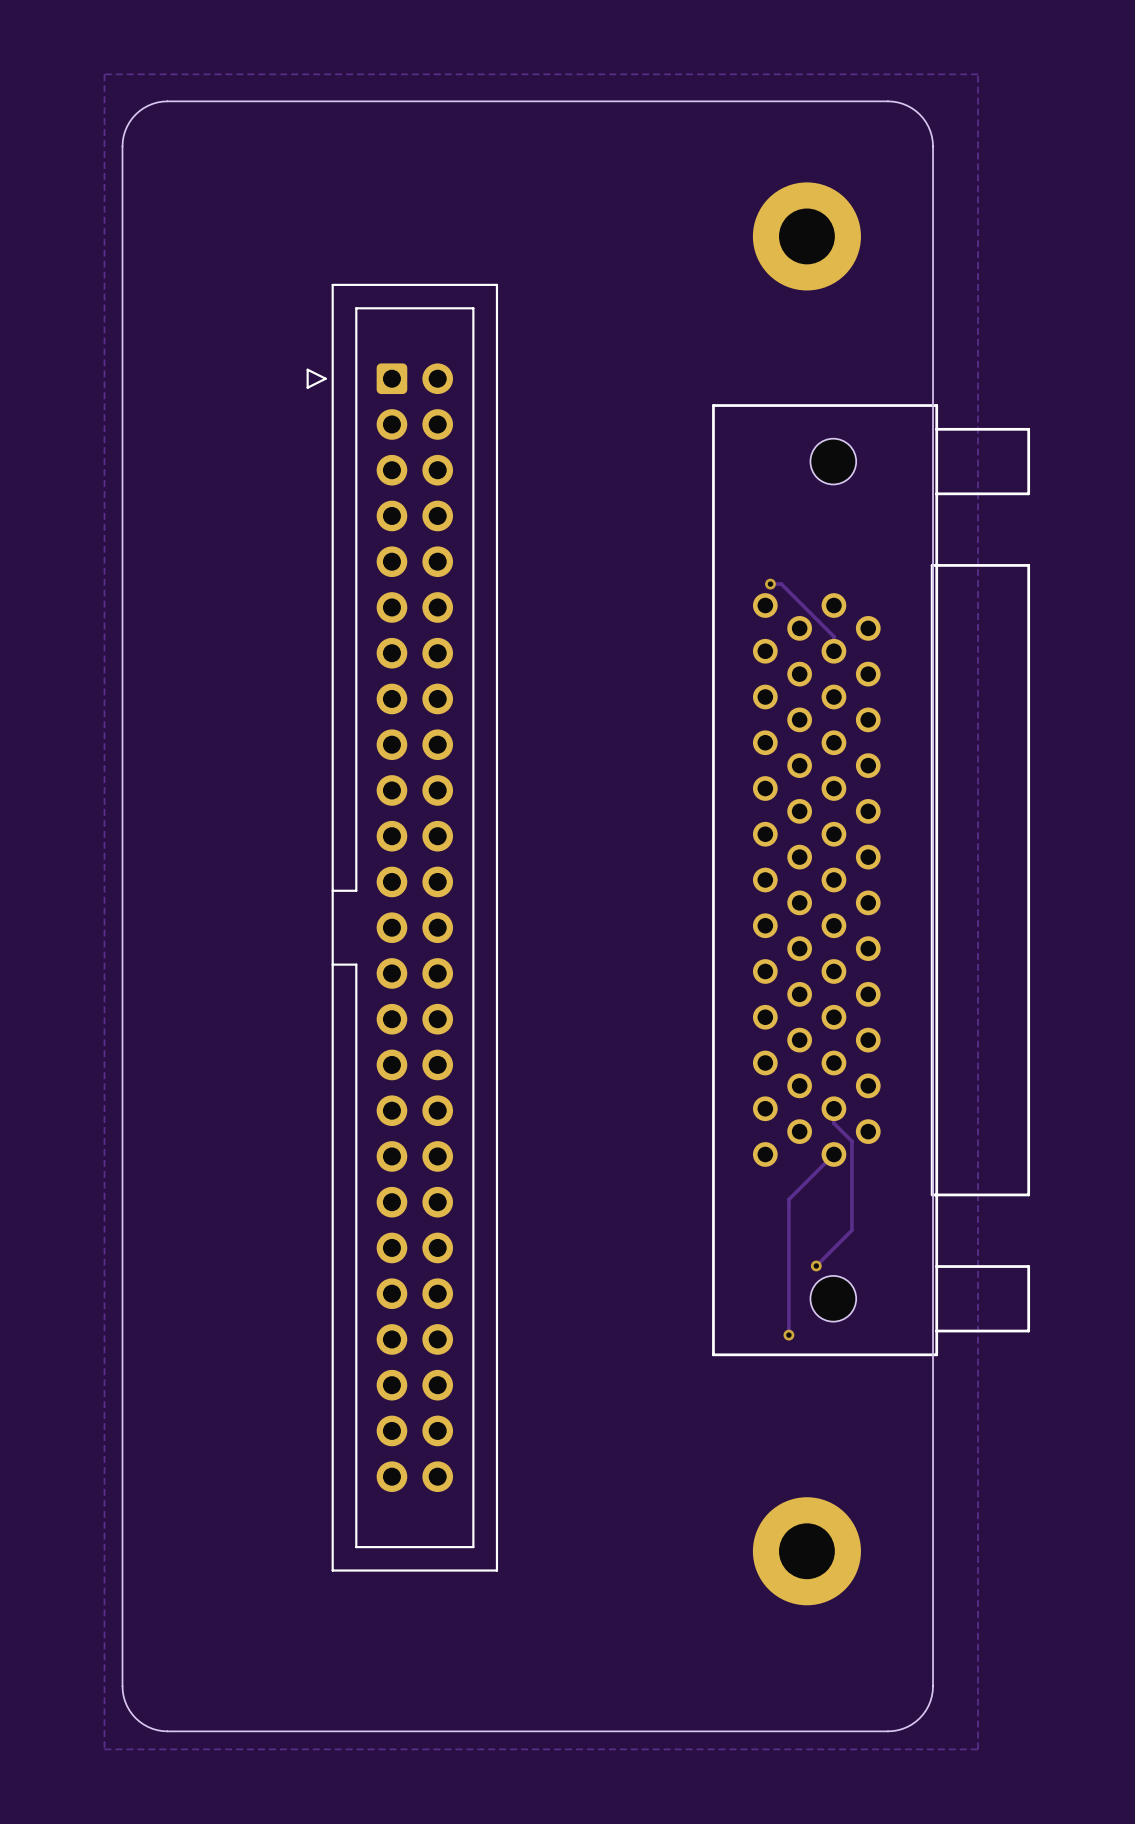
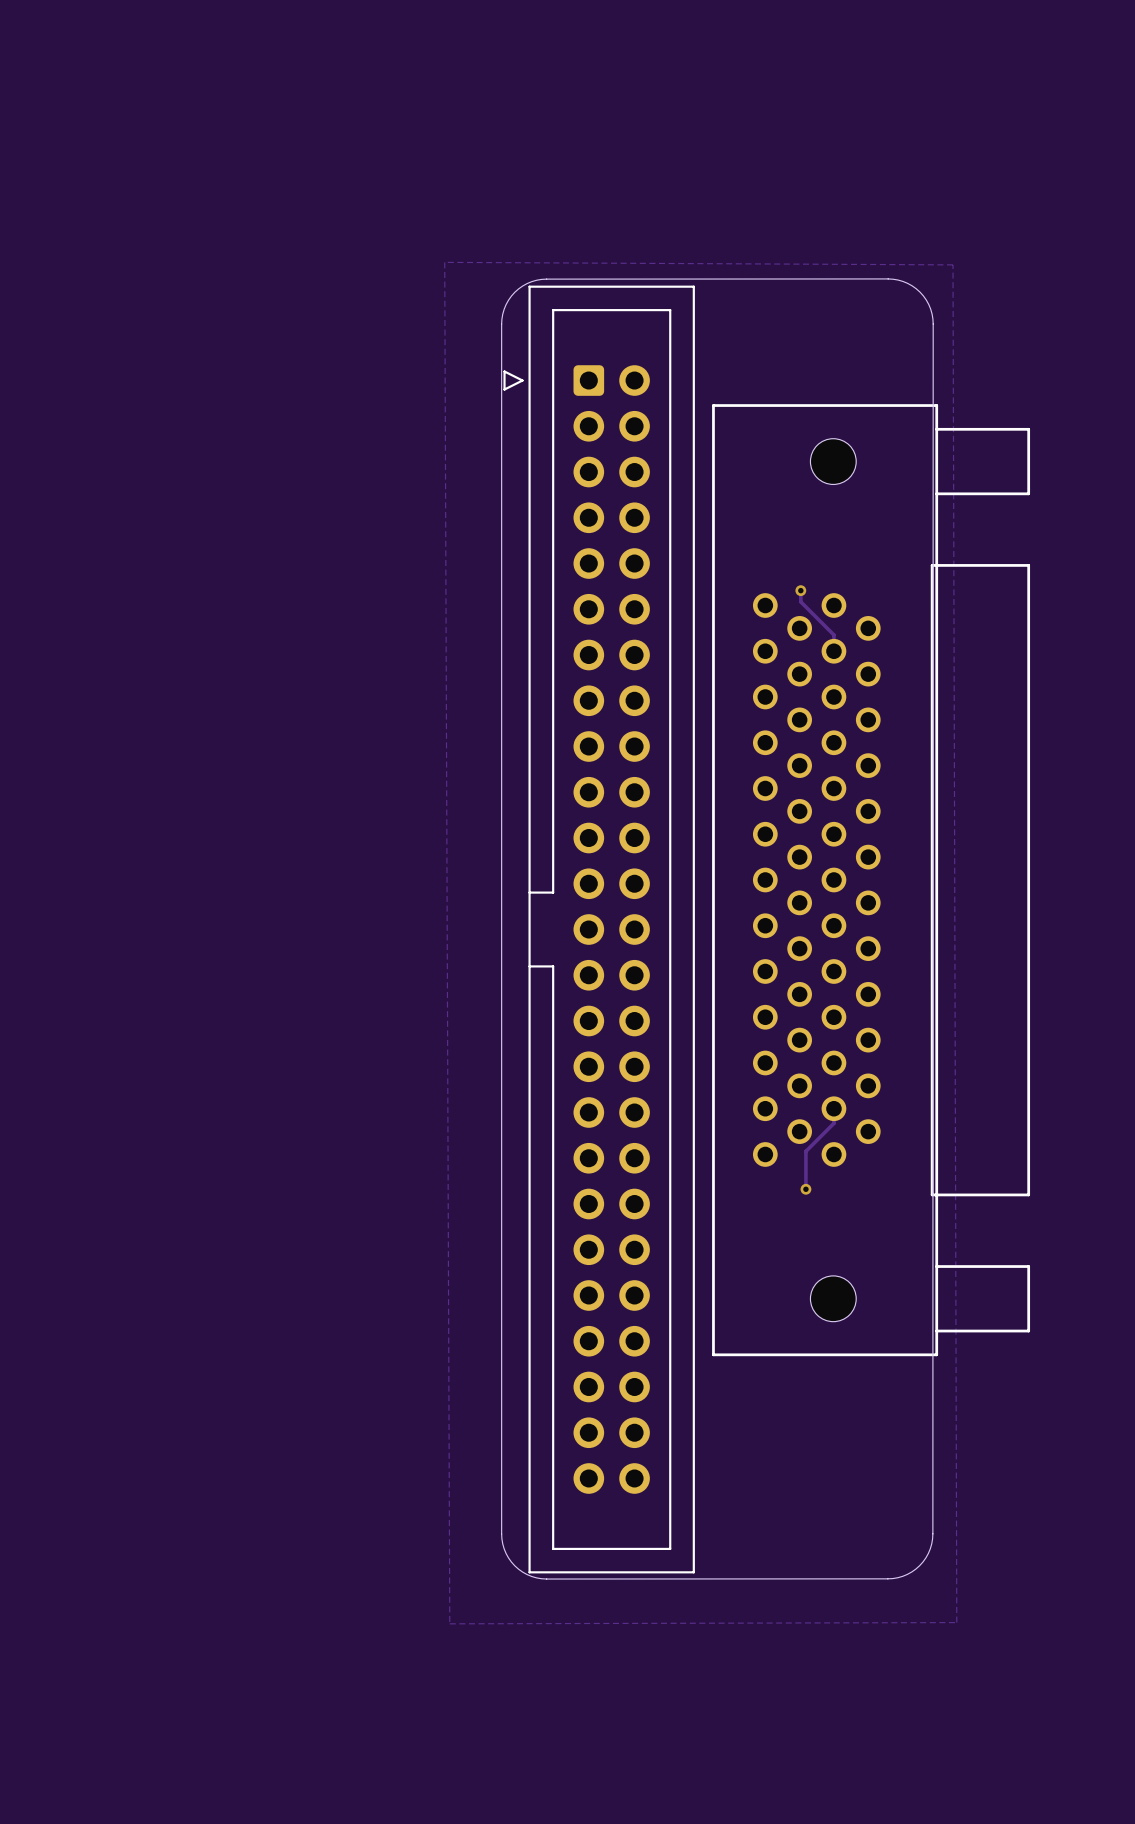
zone outline: (104, 74) (104, 1749) (978, 1749) (978, 74) (104, 74) -> none
board edge: (167, 101) (887, 101) (898, 102) (911, 108) (923, 118) (928, 126) (933, 146) (933, 1686) (931, 1696) (926, 1710) (919, 1718) (907, 1726) (887, 1731) (167, 1731) (157, 1730) (143, 1724) (135, 1718) (126, 1705) (122, 1686) (122, 146) (126, 126) (135, 114) (148, 105) (167, 101) -> none
part: (806, 236) -> none
zone outline: none -> (444, 262) (449, 1623) (956, 1622) (953, 264) (444, 262)
board edge: none -> (888, 278) (541, 279) (527, 283) (518, 288) (508, 300) (502, 314) (501, 1534) (504, 1548) (511, 1562) (522, 1572) (536, 1577) (892, 1578) (907, 1574) (919, 1565) (925, 1557) (931, 1543) (933, 323) (930, 309) (920, 292) (907, 283) (888, 278)
track: (770, 584) (781, 584) (833, 636) -> (800, 590) (800, 601) (833, 636)
via position: (770, 584) -> (800, 590)
part position: (402, 927) -> (599, 929)
track: (833, 1123) (851, 1141) (851, 1230) (816, 1265) -> (833, 1123) (805, 1151) (805, 1189)
track: (833, 1154) (788, 1199) (788, 1335) -> none
via: none -> (805, 1189)
via: (816, 1265) -> none
via: (788, 1335) -> none
part: (806, 1551) -> none

